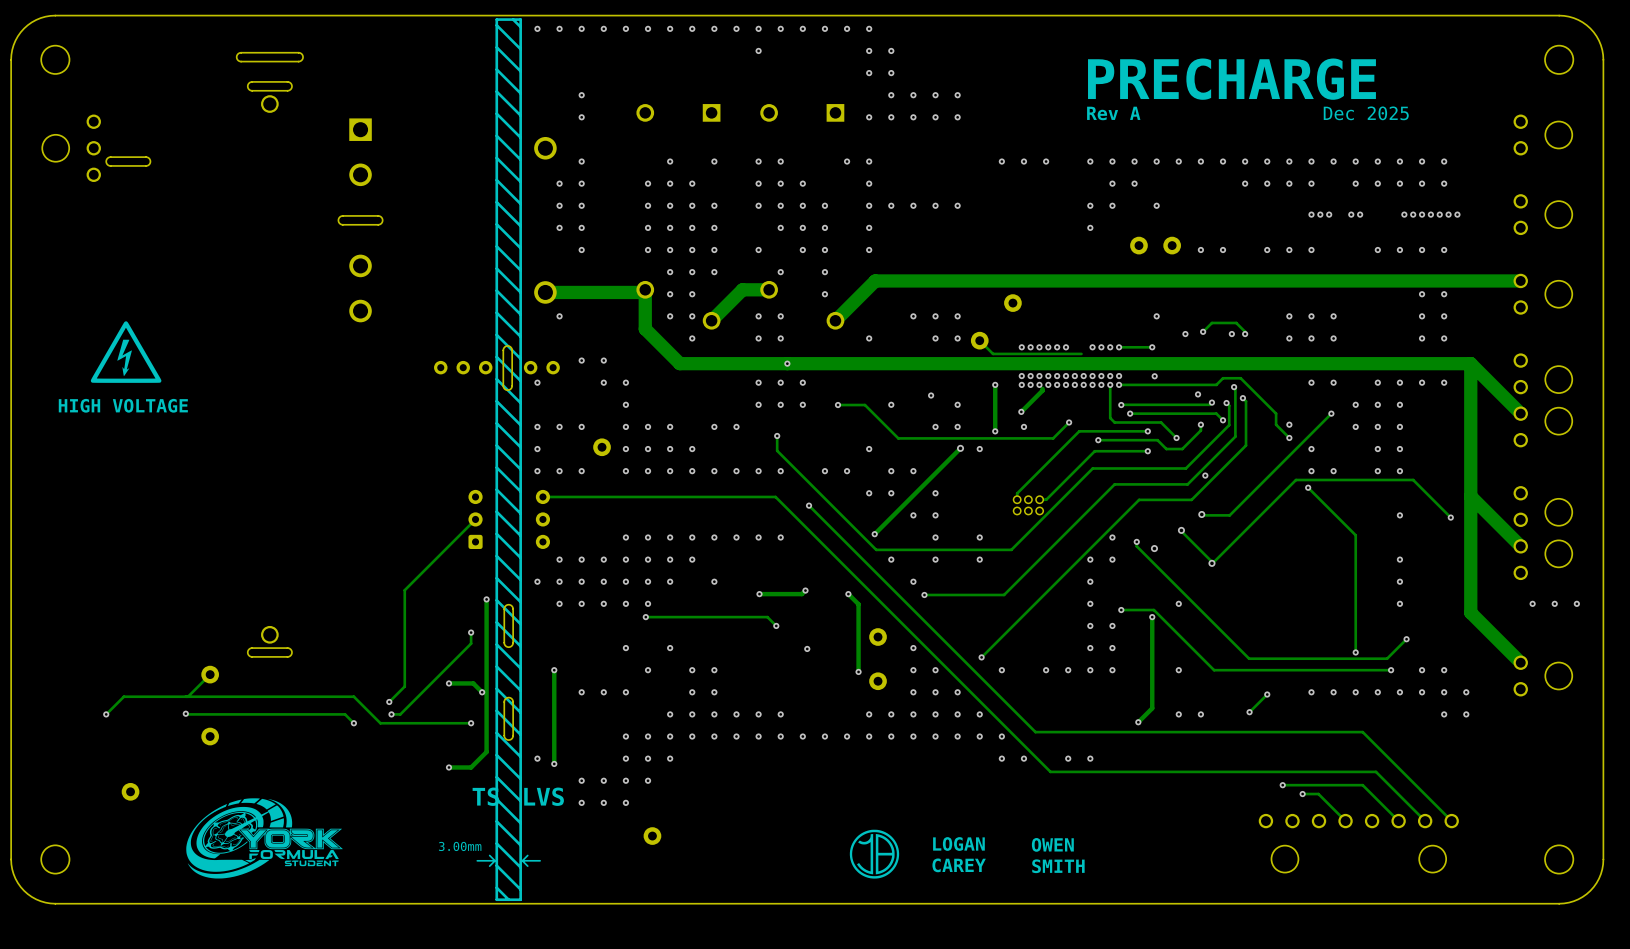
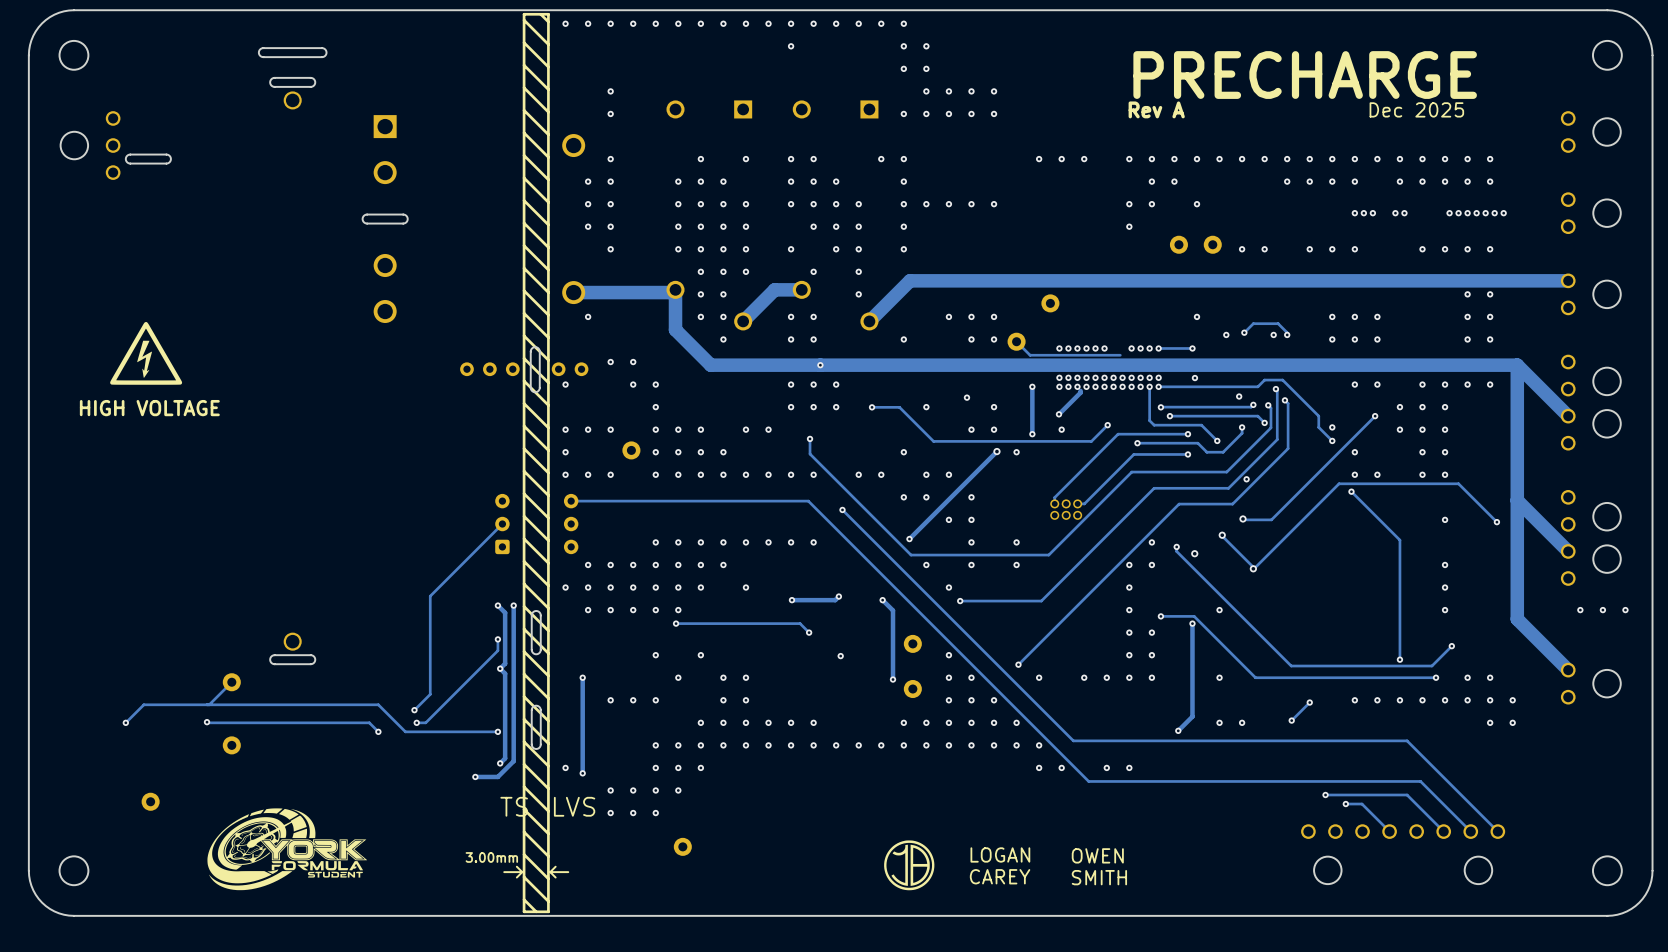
track: none -> (497, 605) (505, 612) (505, 663) (500, 668) (505, 673) (505, 758) (500, 763)
via: none -> (497, 605)
via: none -> (500, 668)
track: (449, 683) (473, 683) (482, 692) -> none
via: (449, 683) -> none
via: (482, 692) -> none
via: none -> (500, 763)

